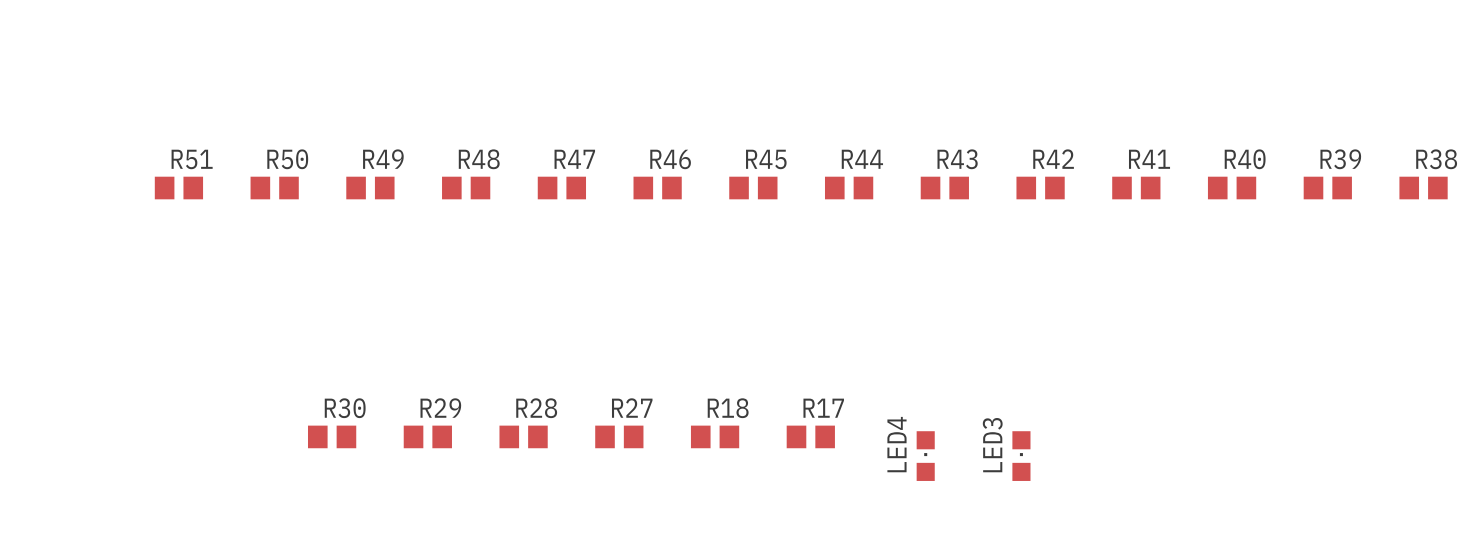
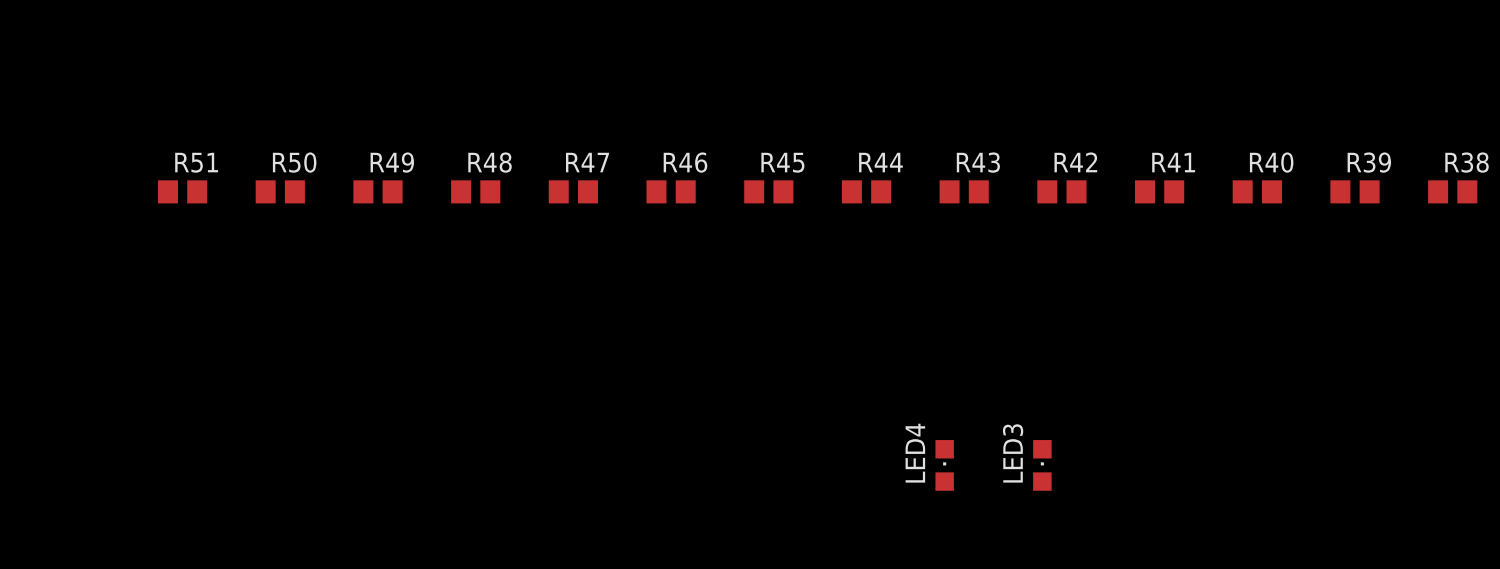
R30: (332, 436) -> none
R29: (427, 436) -> none
R28: (523, 436) -> none
R27: (619, 436) -> none
R18: (715, 436) -> none
R17: (810, 436) -> none

